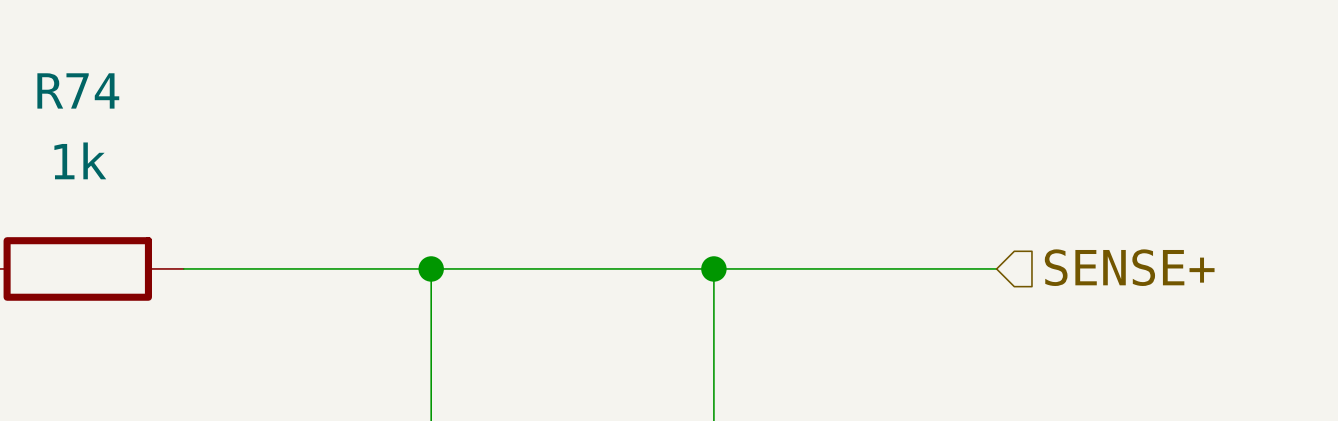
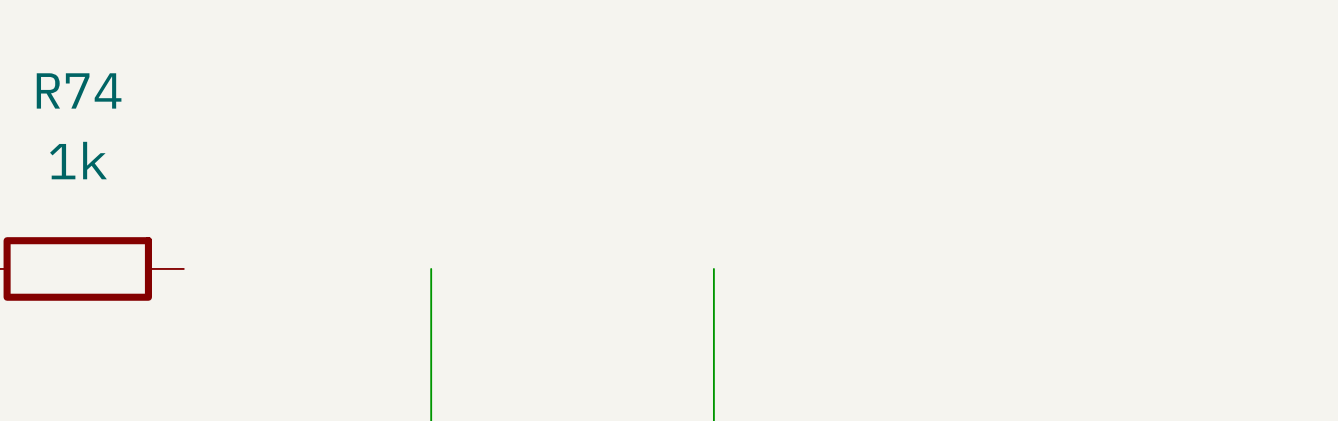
hierarchical label: SENSE+ (1129, 267) -> none
wire: (183, 268) (996, 268) -> none
junction: (431, 268) -> none
junction: (713, 268) -> none

